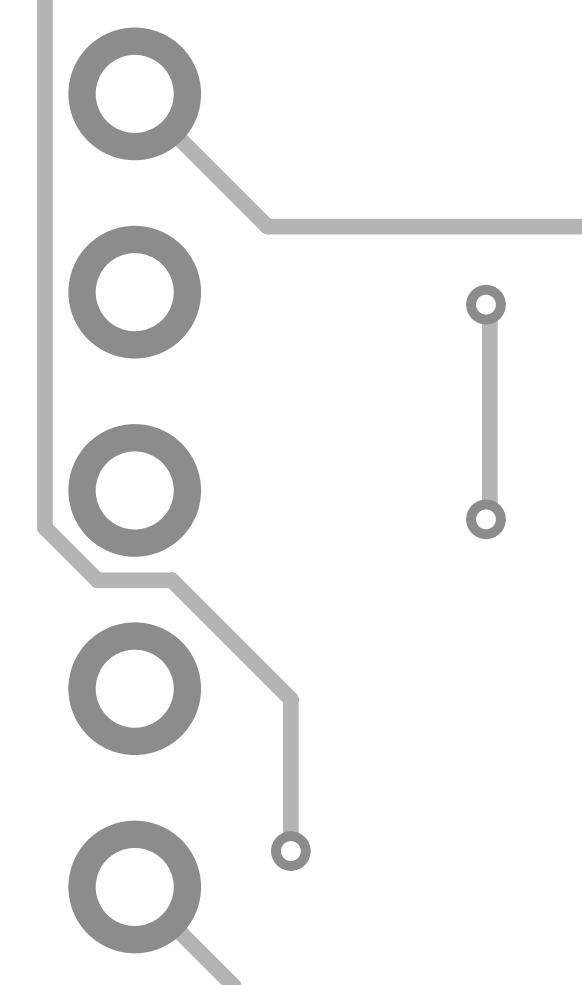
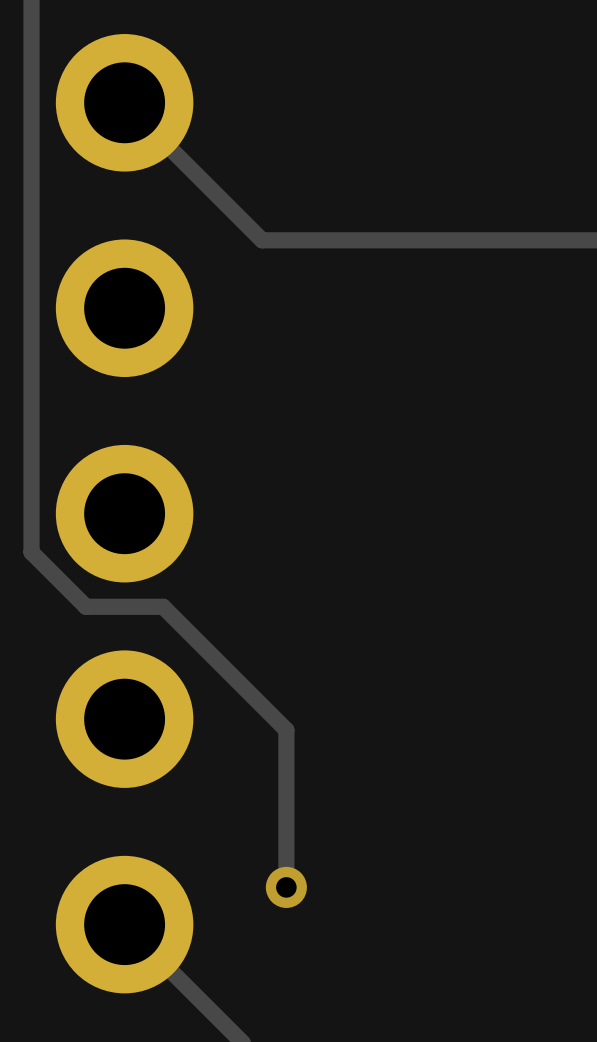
track: (485, 304) (489, 308) (489, 515) (485, 519) -> none
via: (485, 304) -> none
via: (485, 519) -> none

